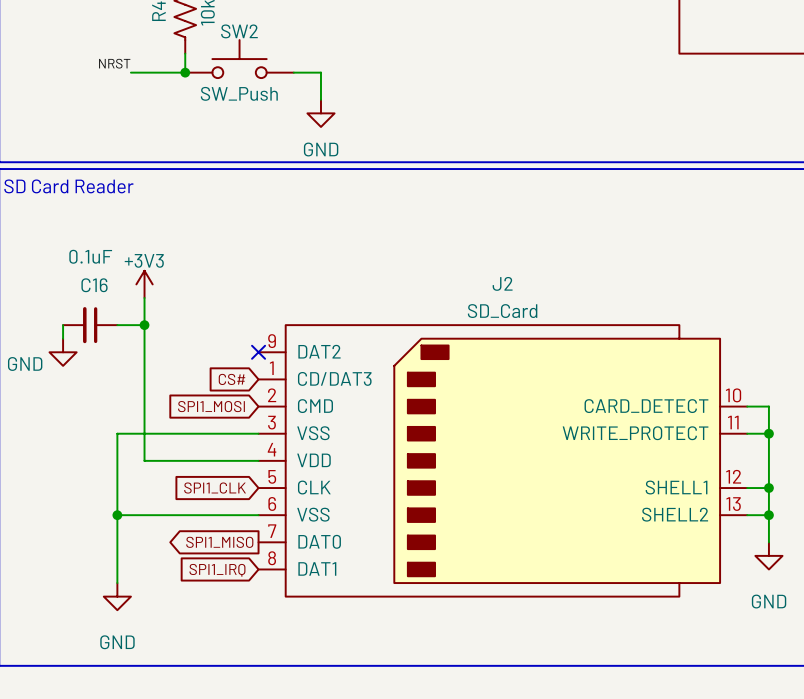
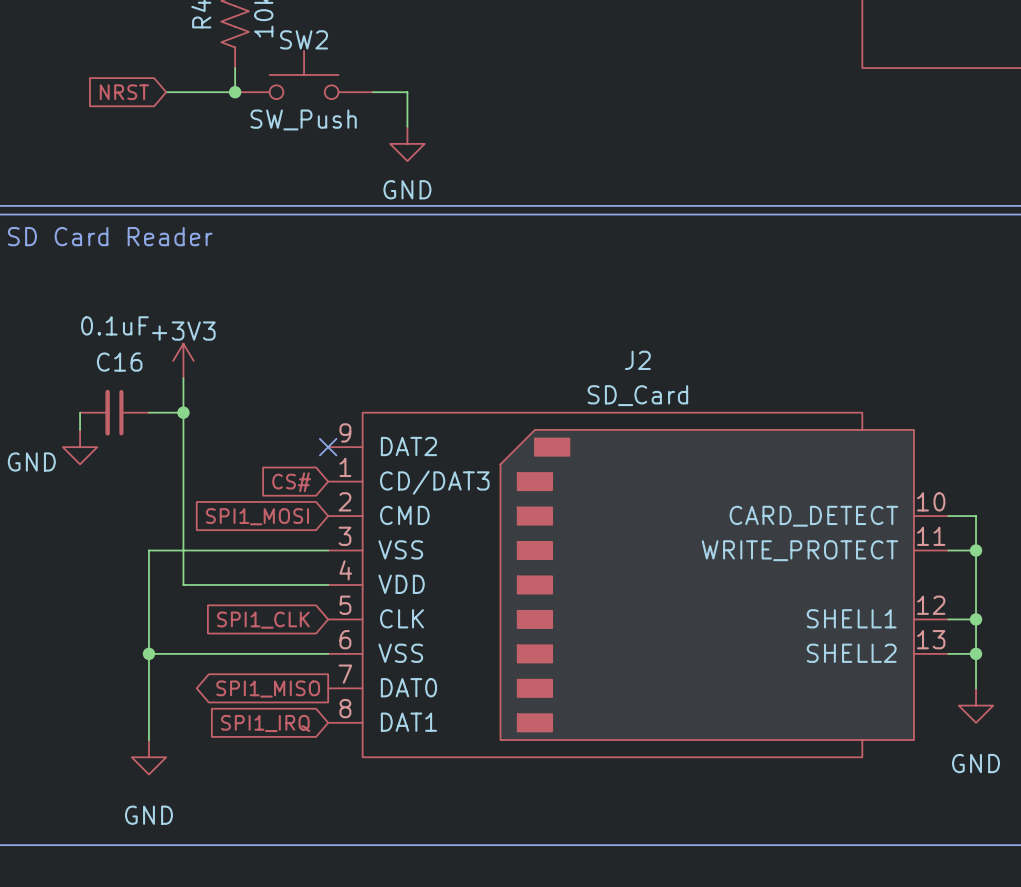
label: NRST (114, 63) -> none
global label: none -> NRST (124, 92)

